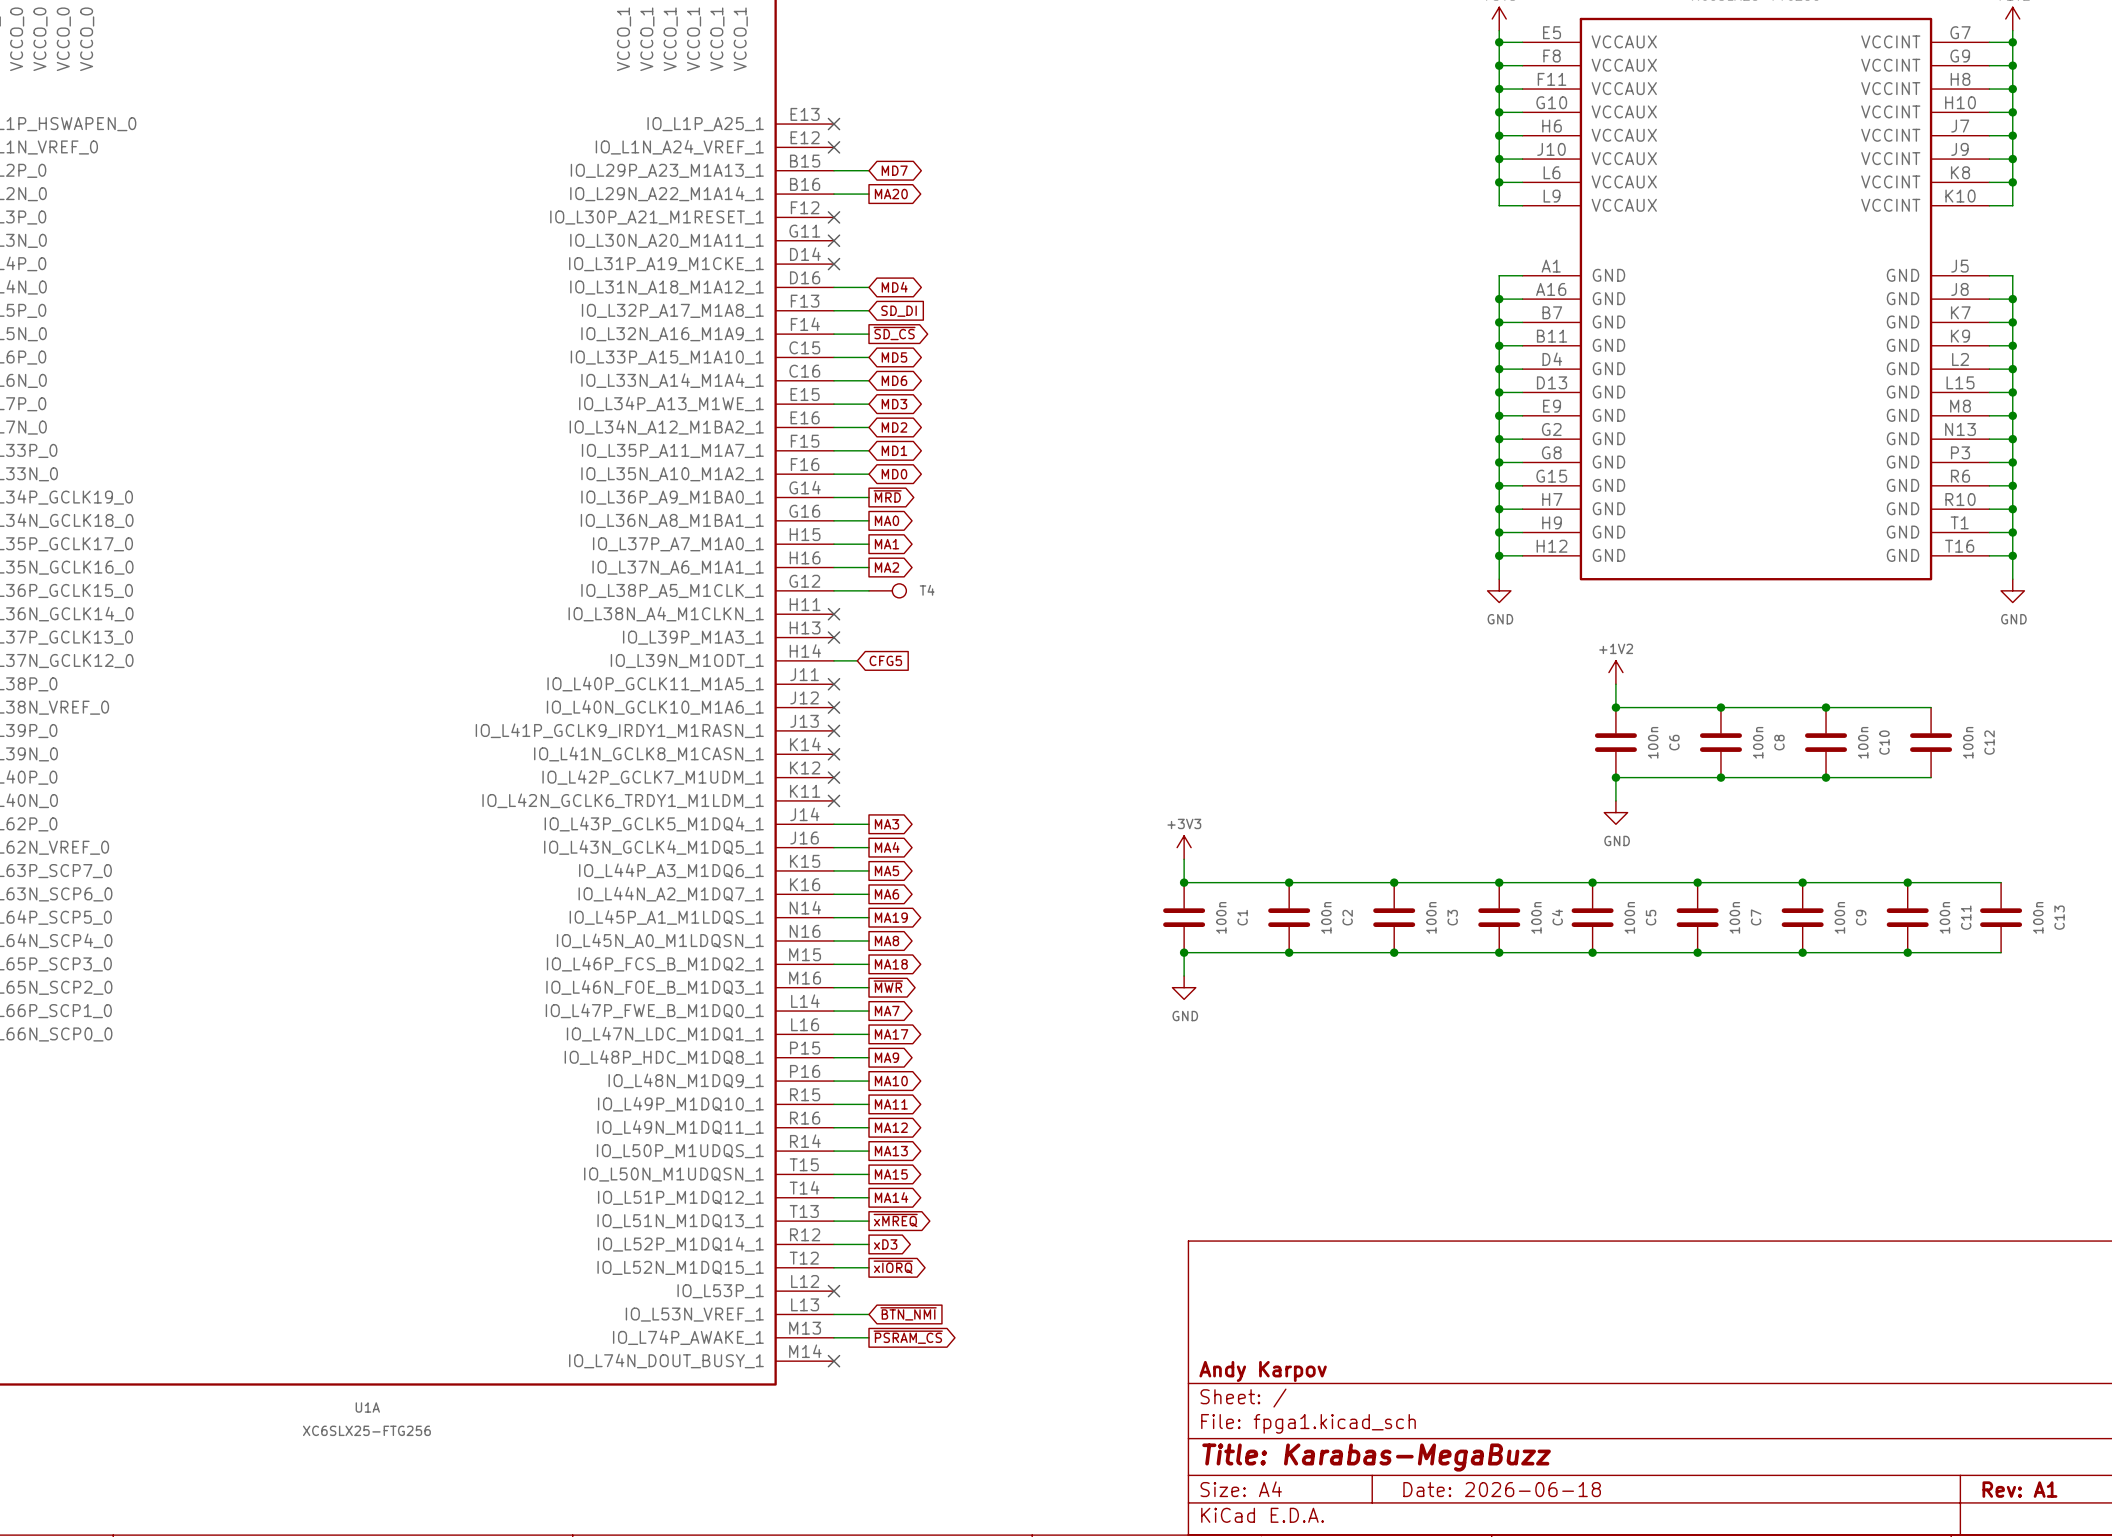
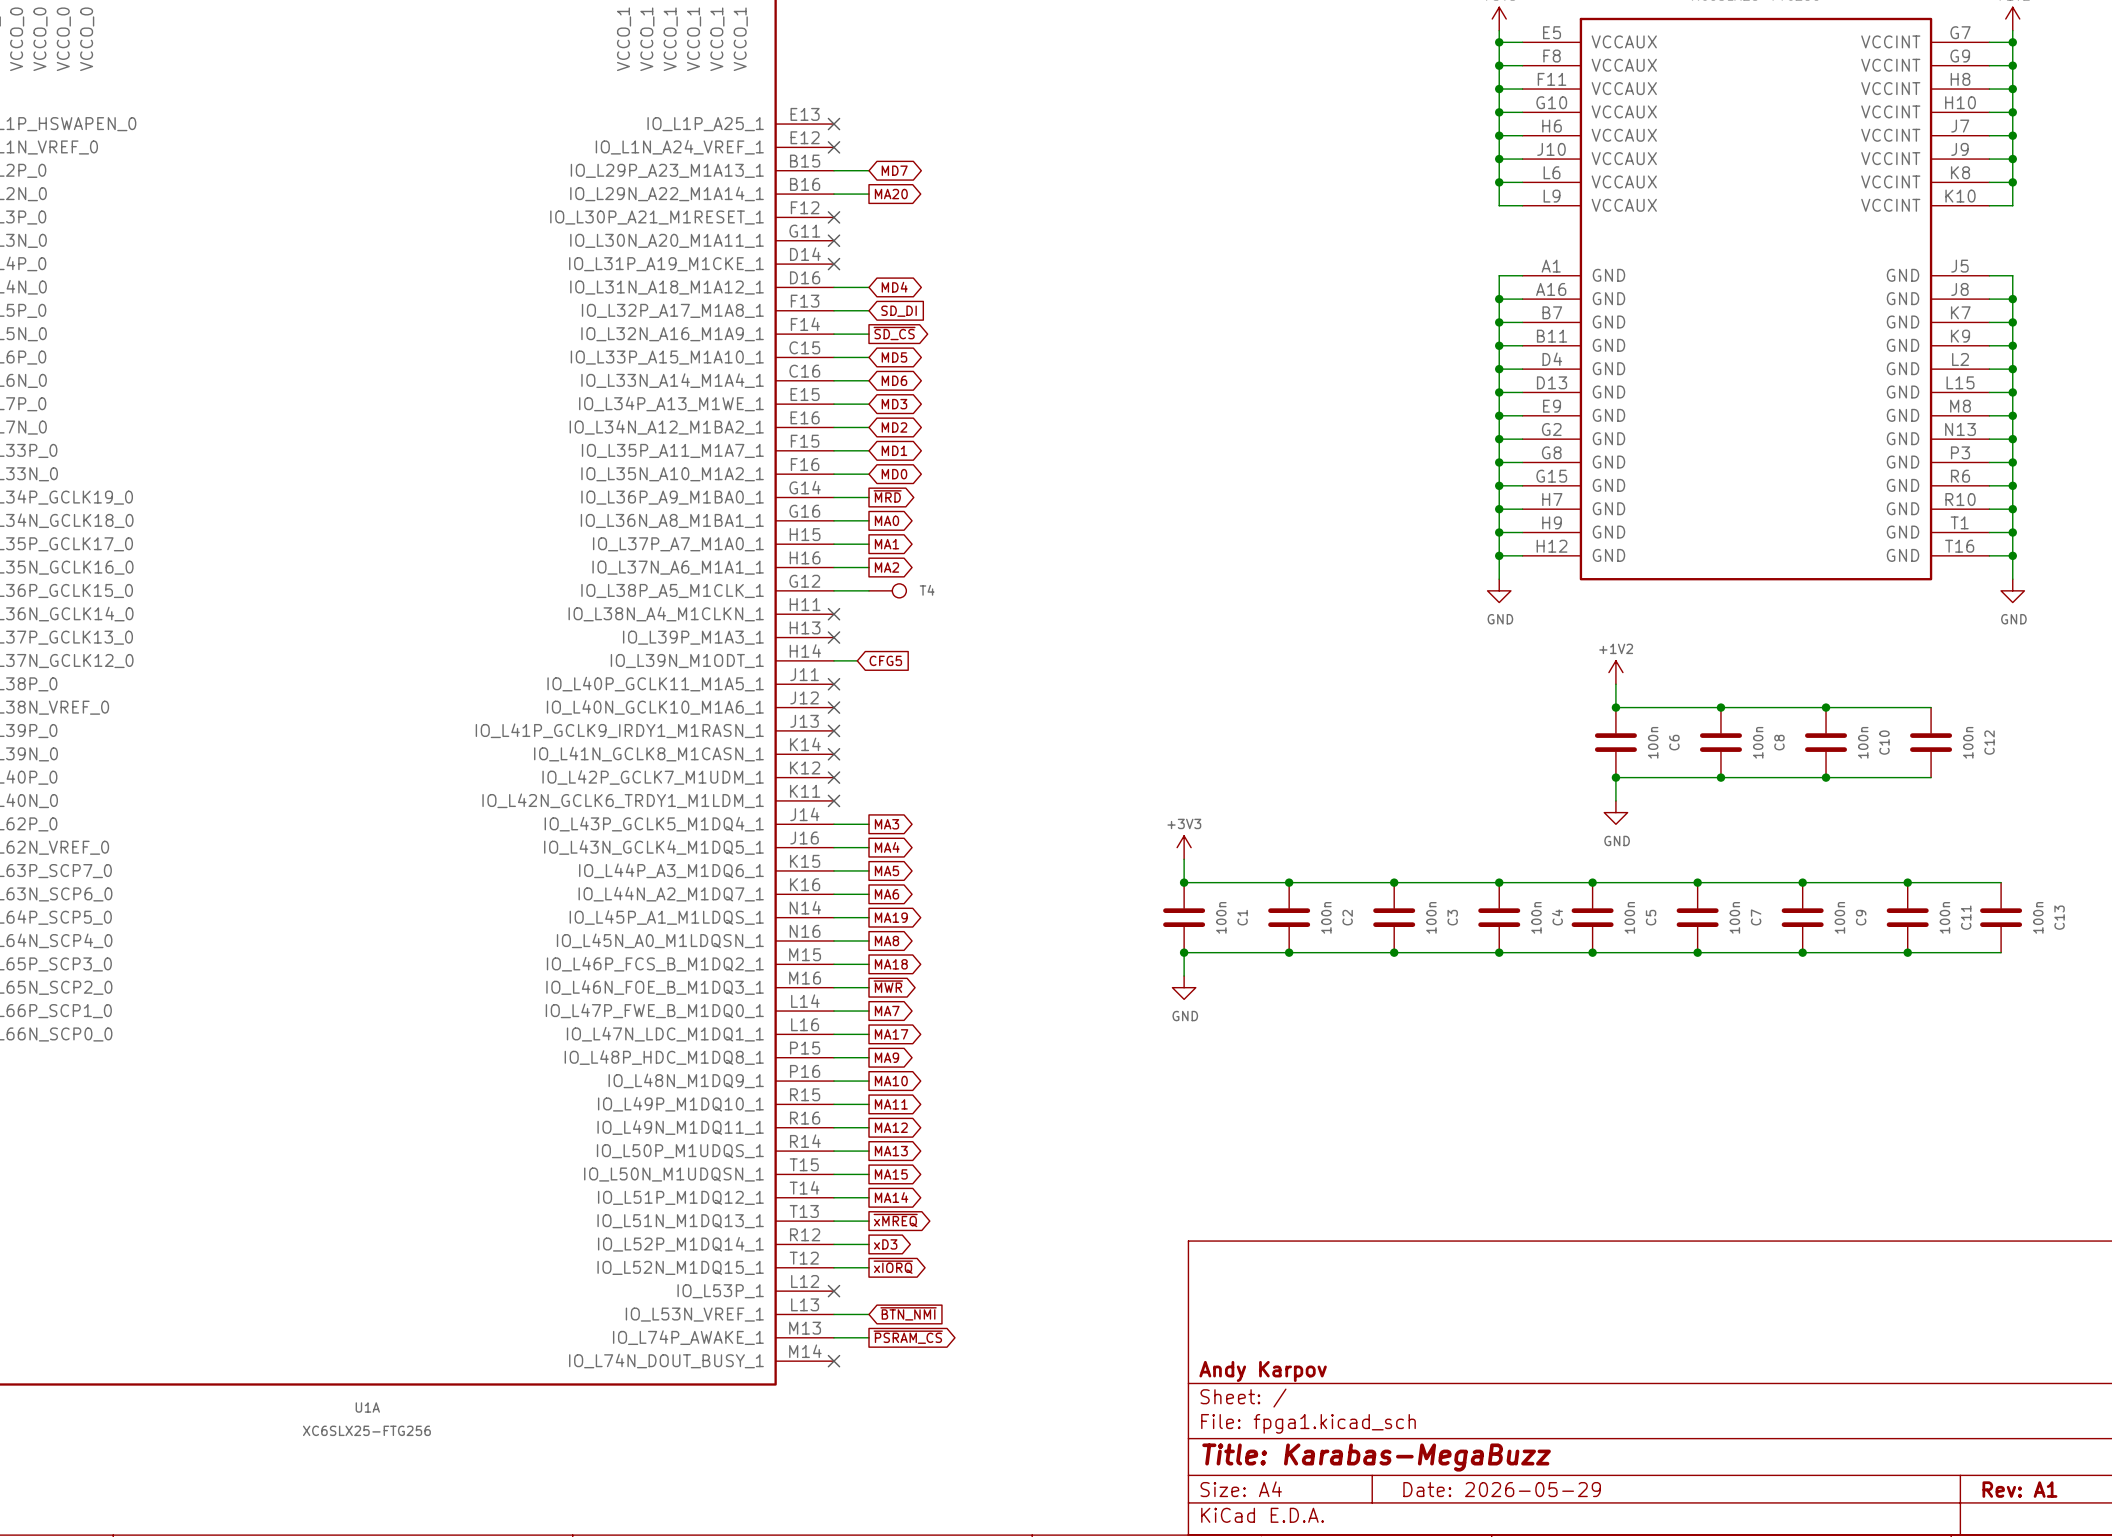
title block: Date: 2026-06-18 (1502, 1489) -> Date: 2026-05-29 (1502, 1489)

